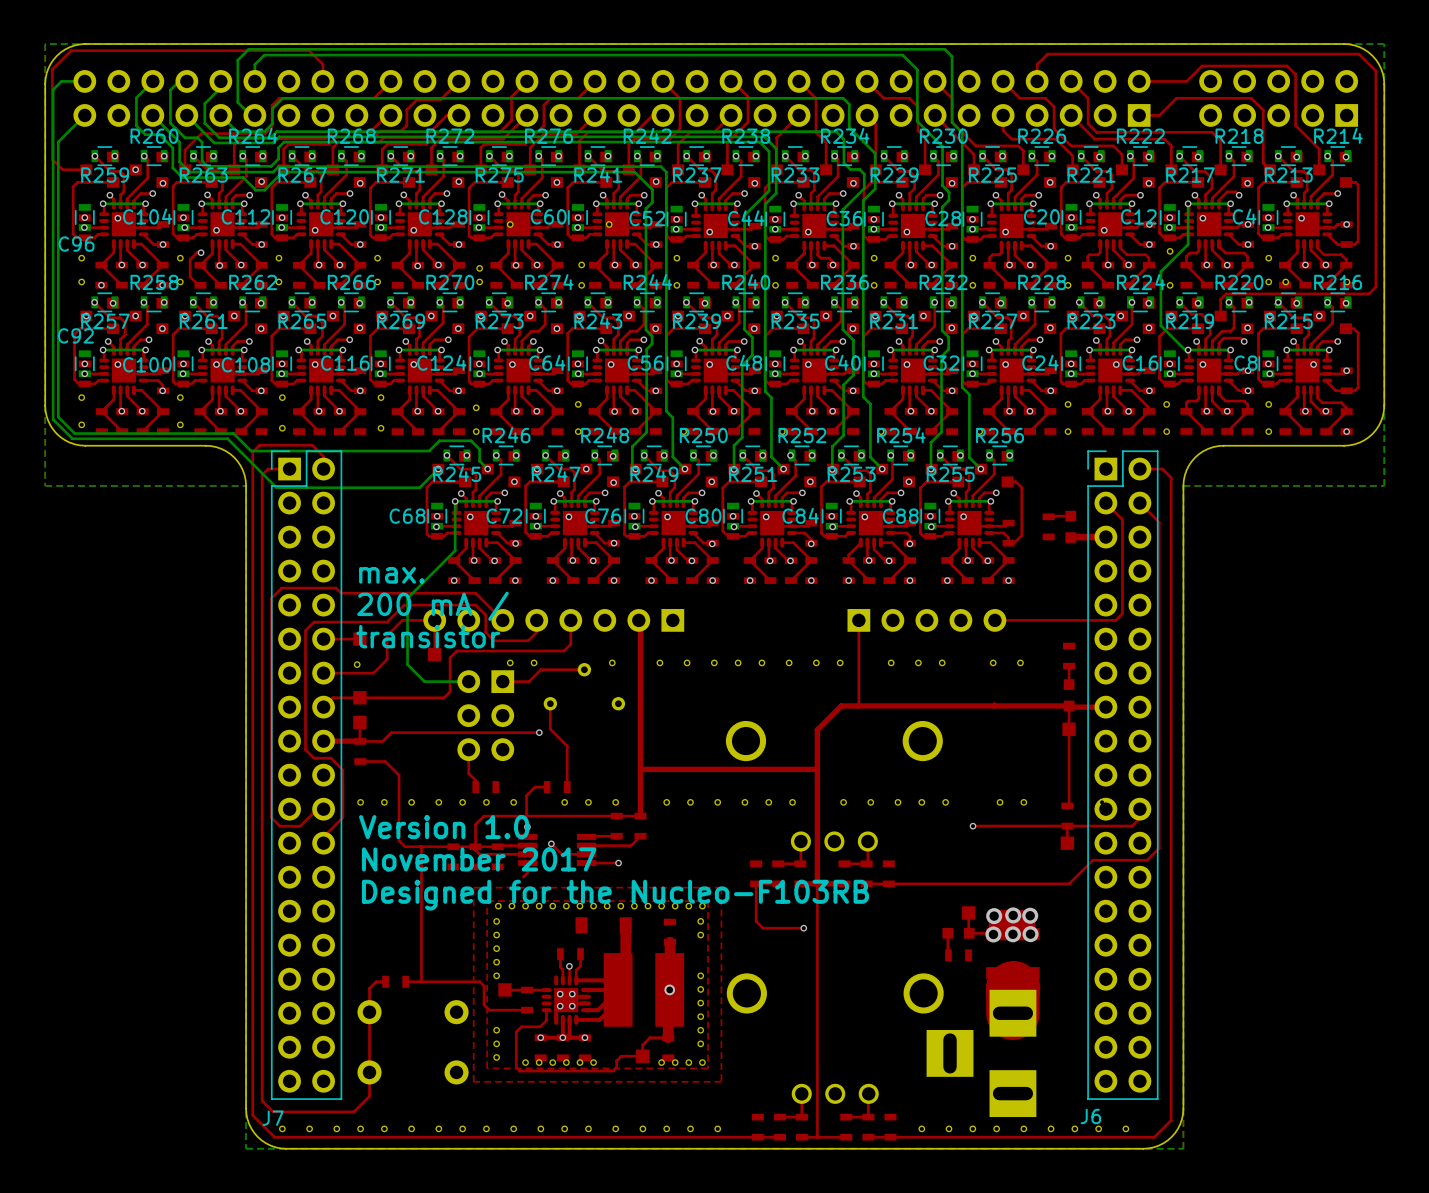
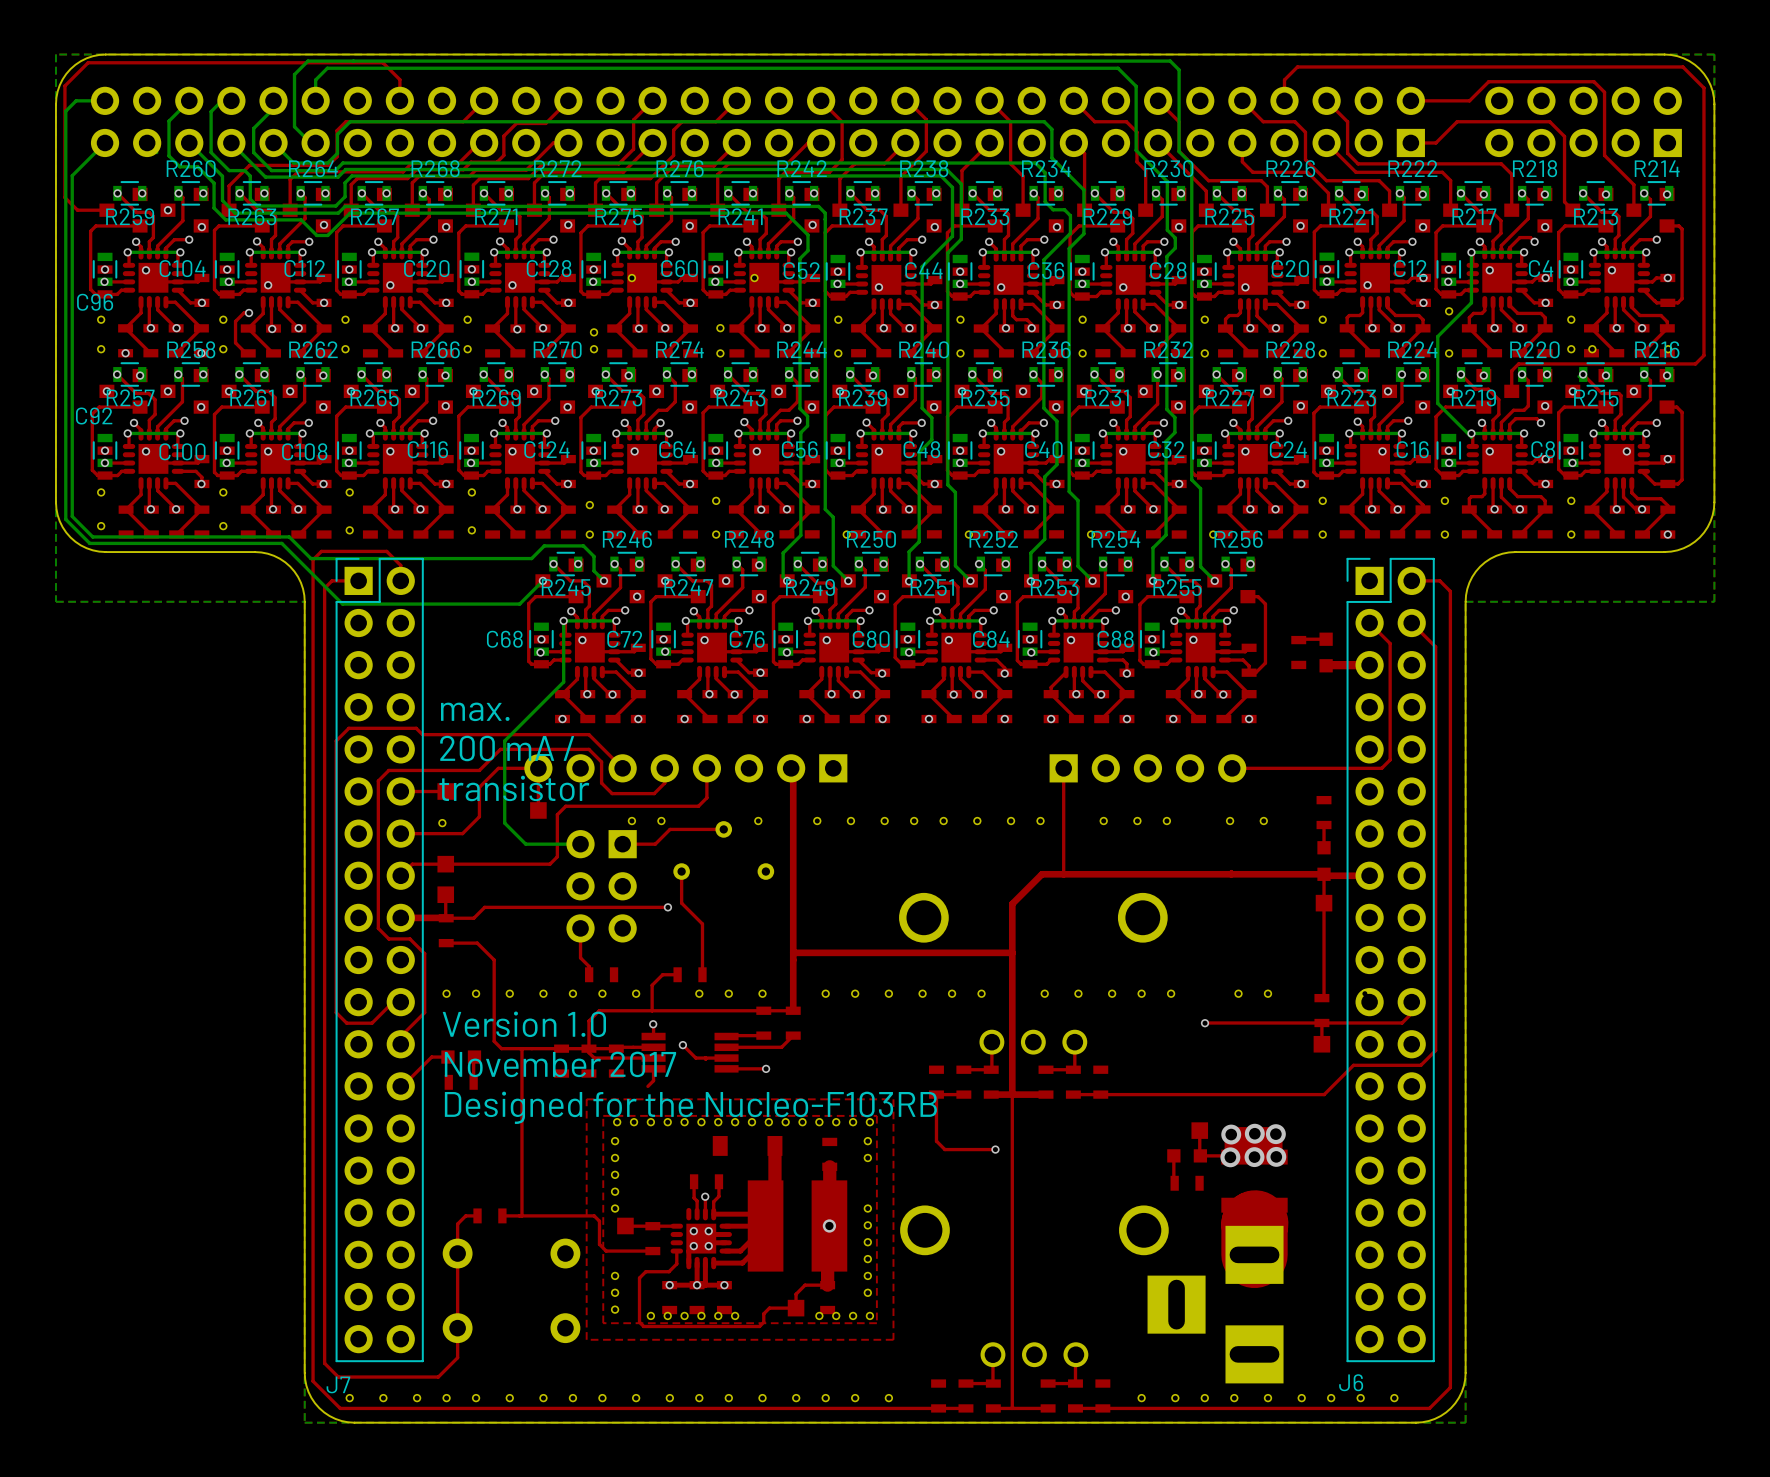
top track: none -> (447, 1057) (431, 1057) (400, 1086)
part: none -> (461, 1057)
top track: none -> (474, 1057) (473, 1082)
part: none -> (461, 1082)

